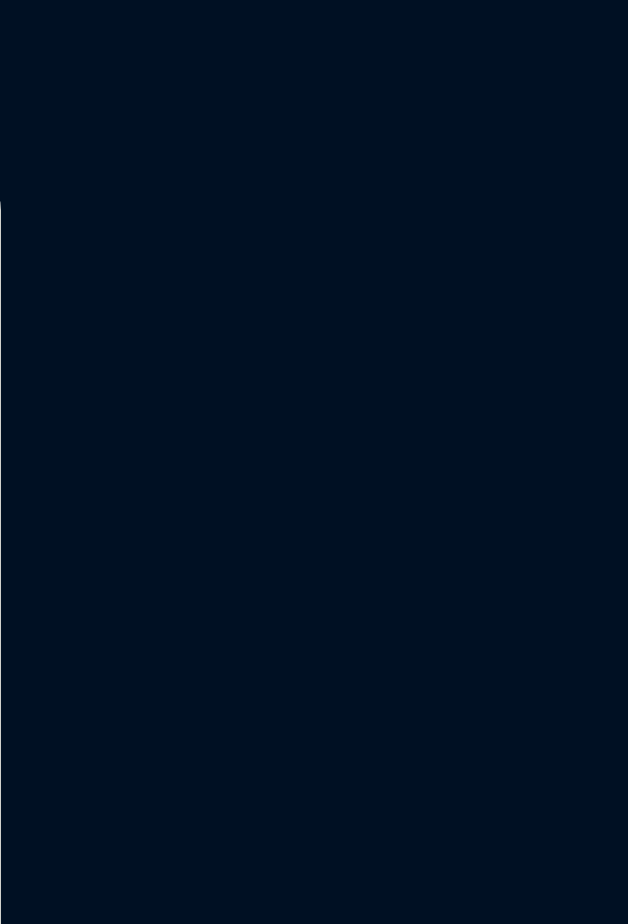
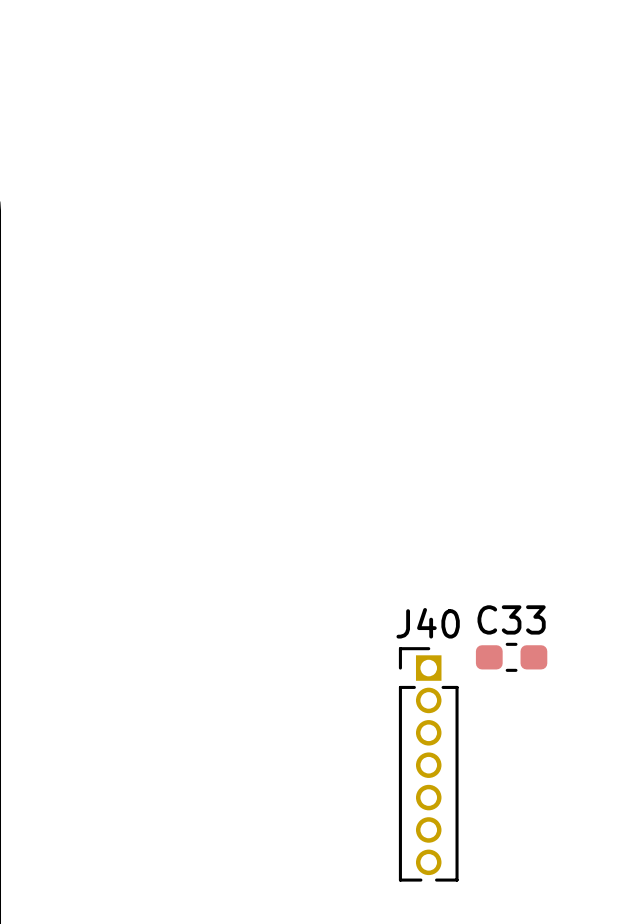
C33: none -> (511, 657)
J40: none -> (428, 764)

